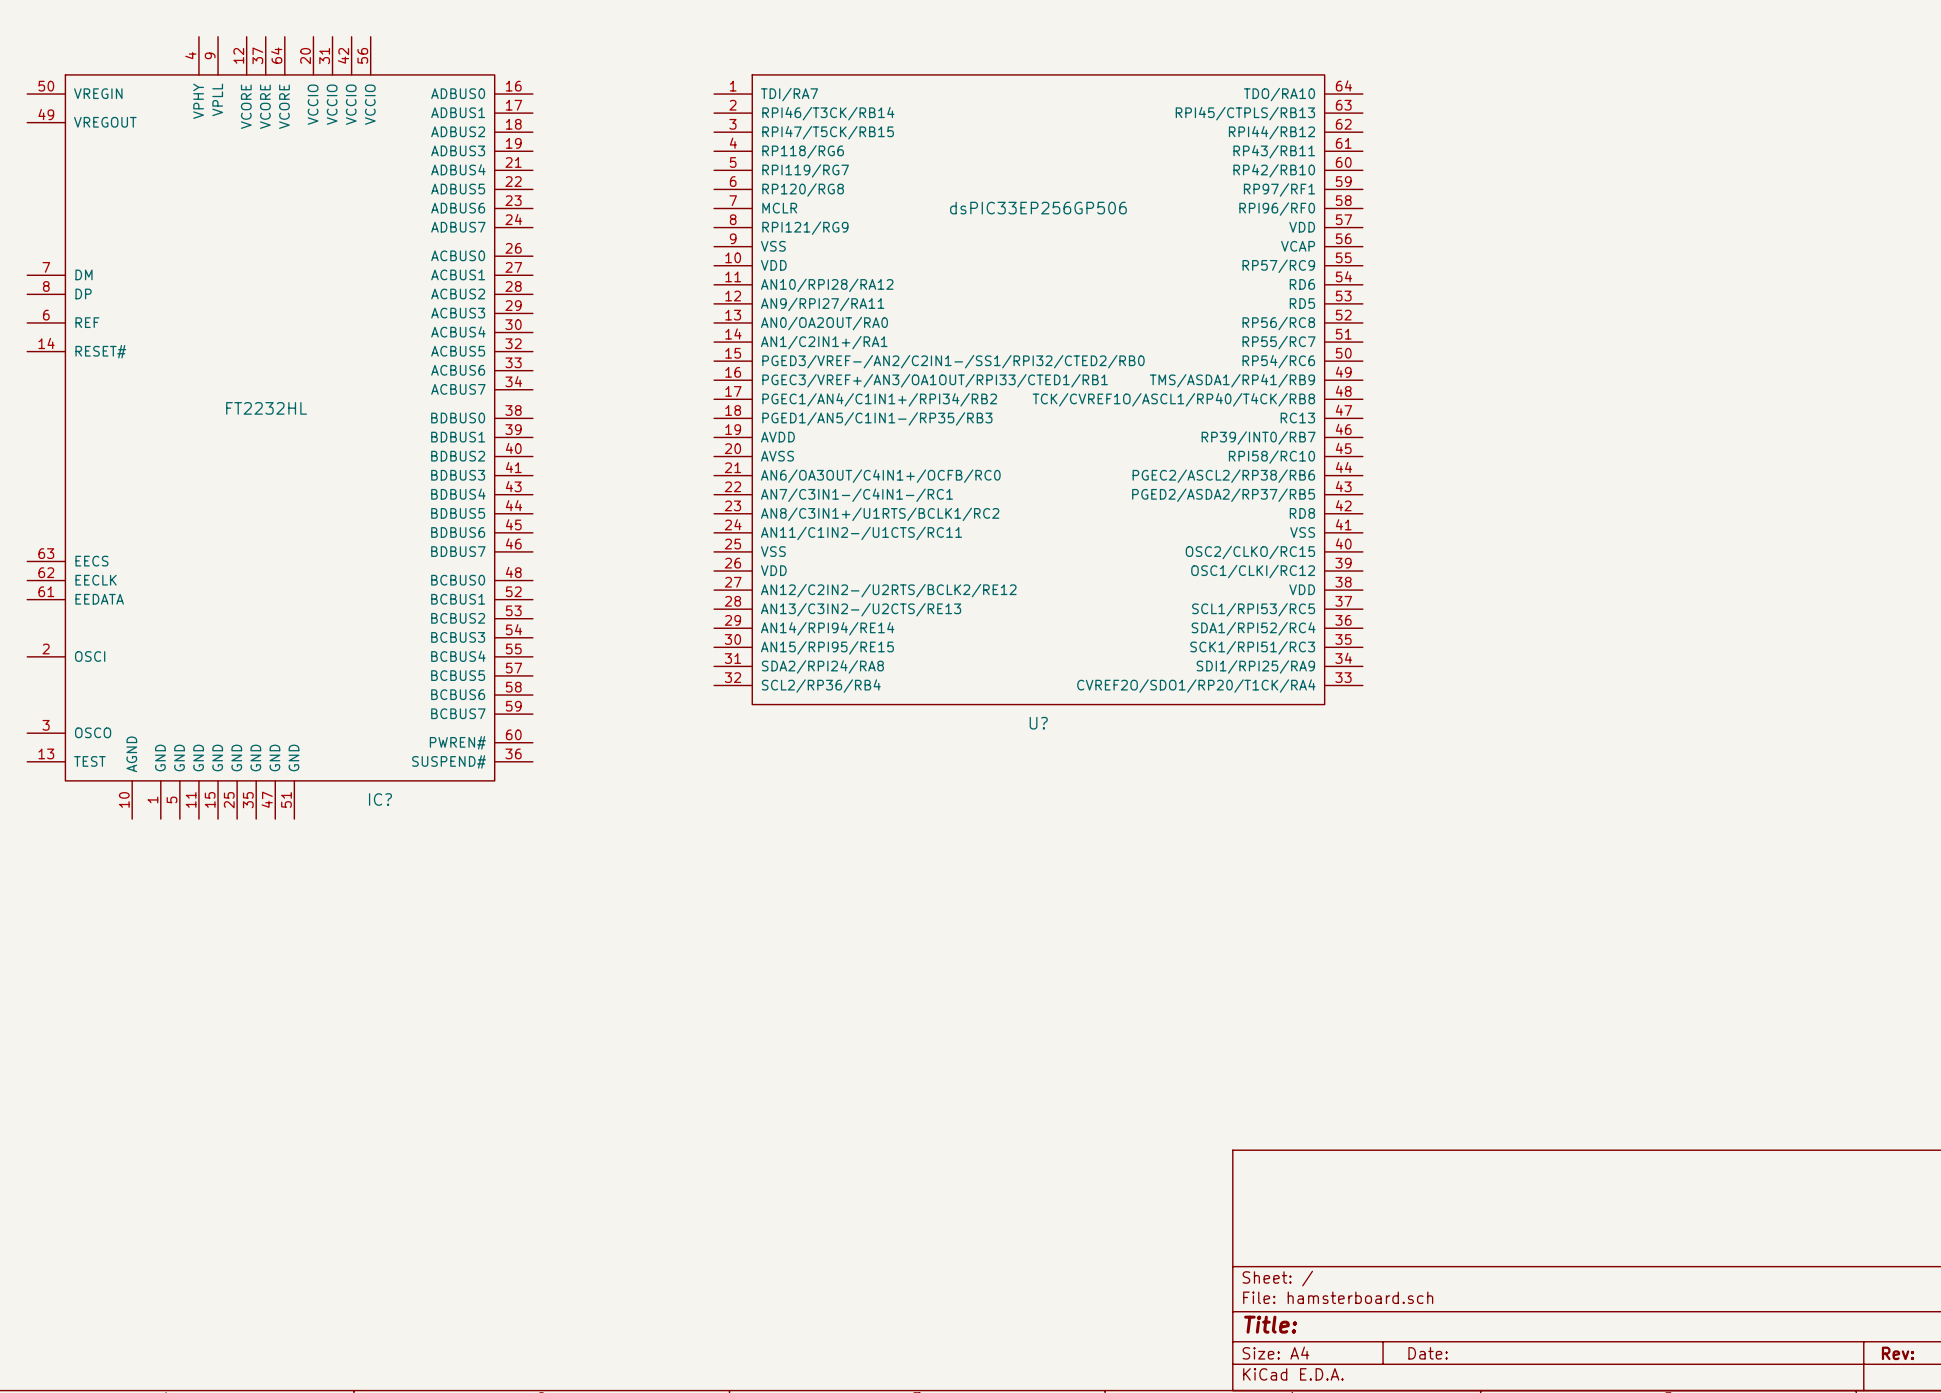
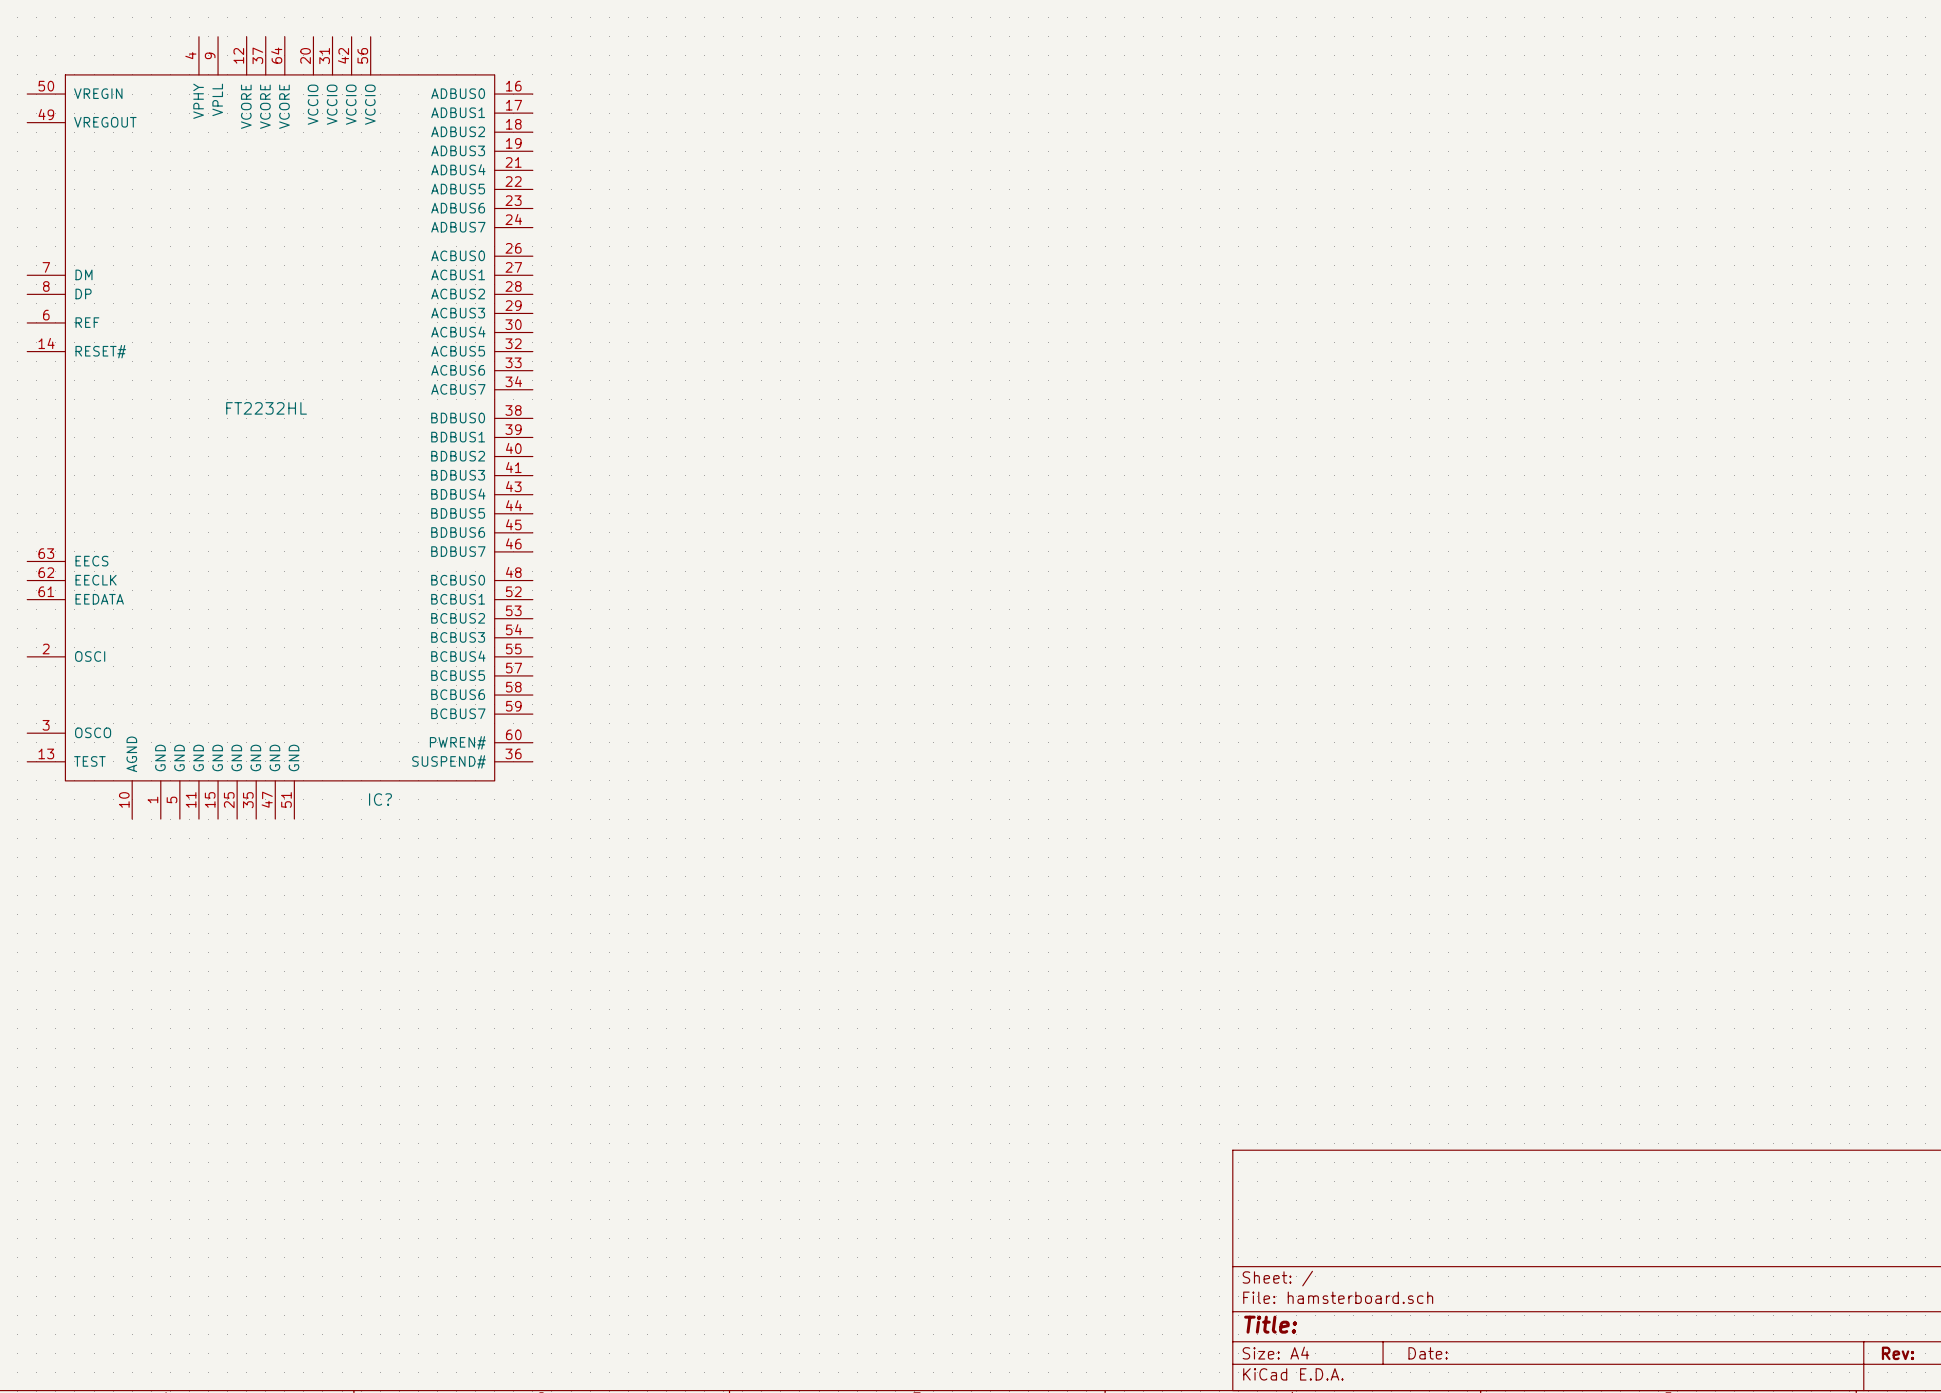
U?: dsPIC33EP256GP506 (1038, 389) -> none

